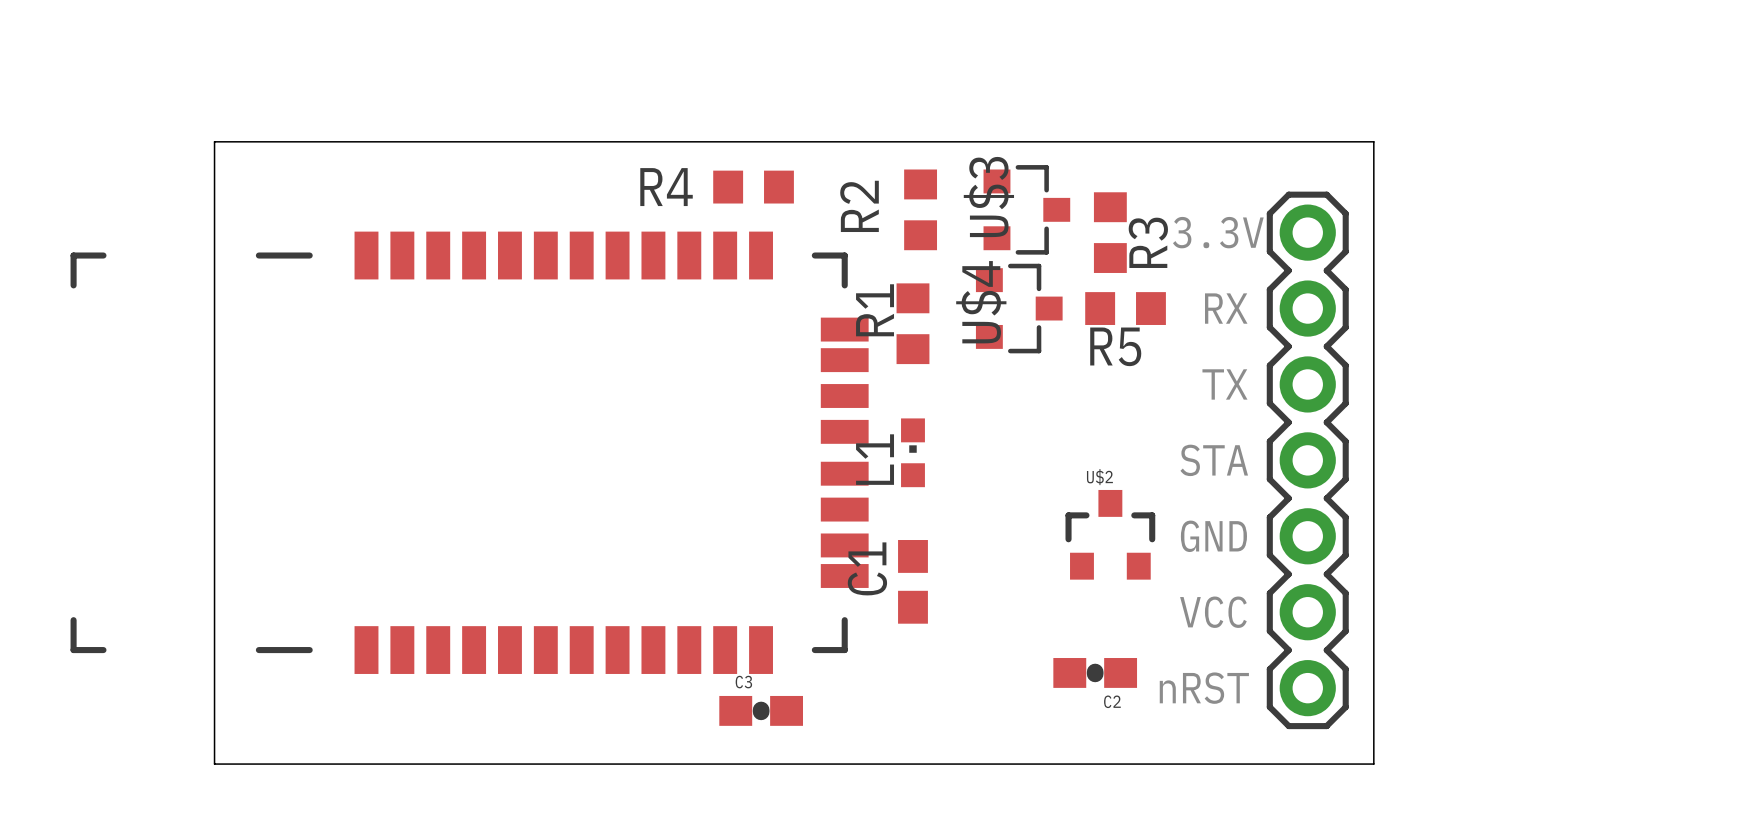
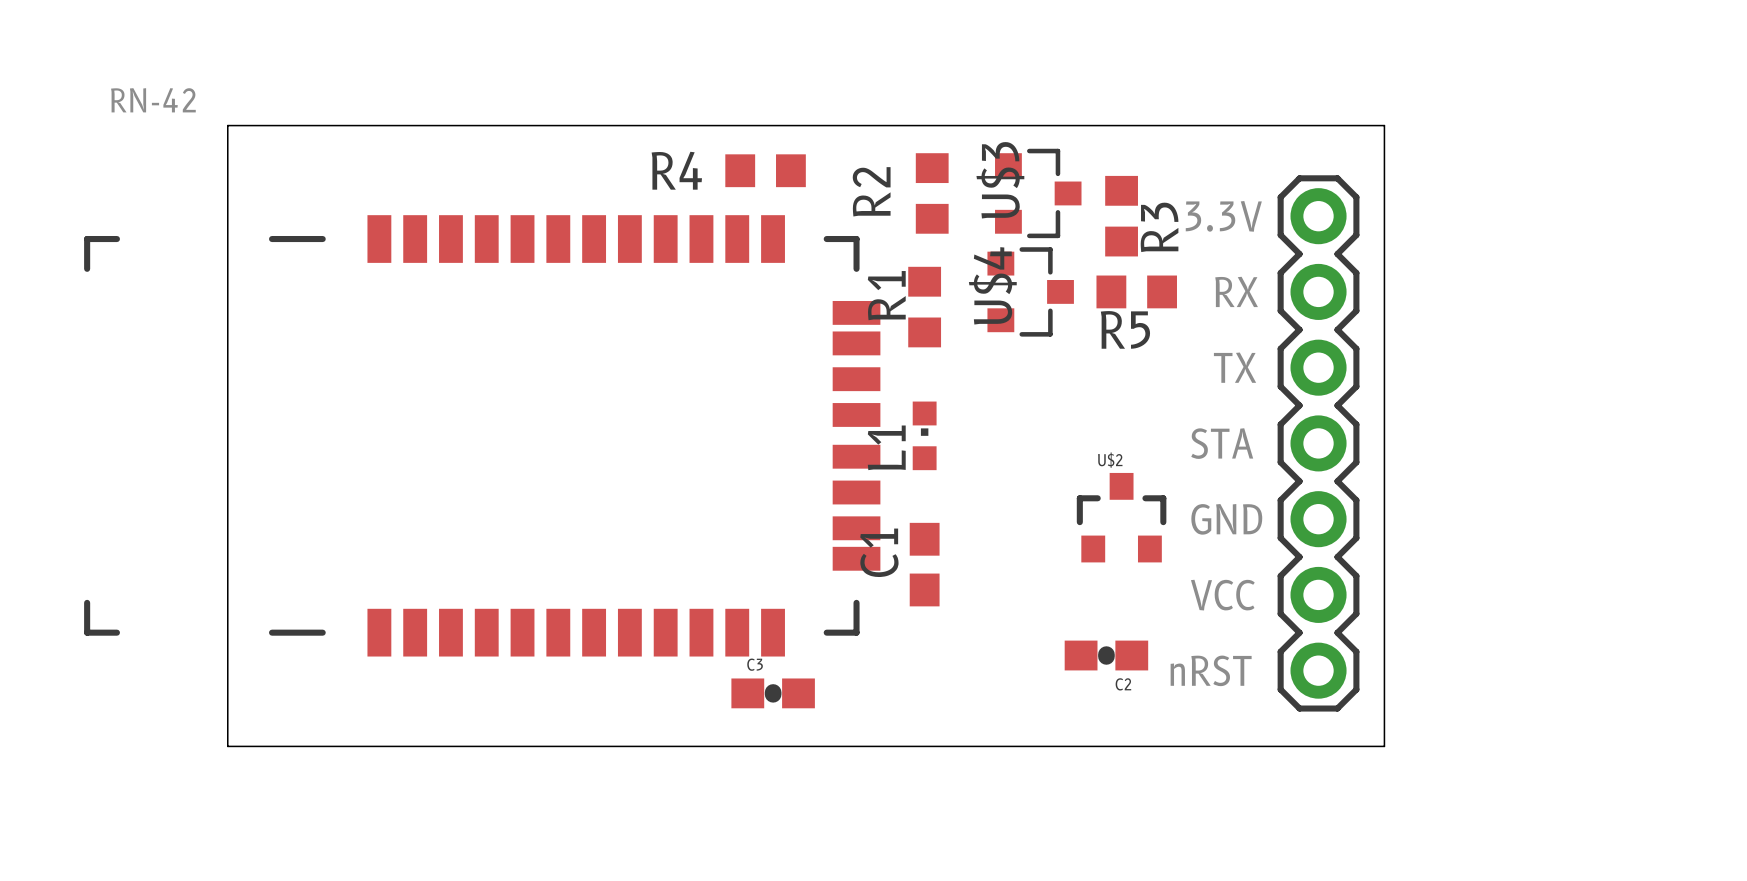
text: none -> RN-42 (153, 100)

